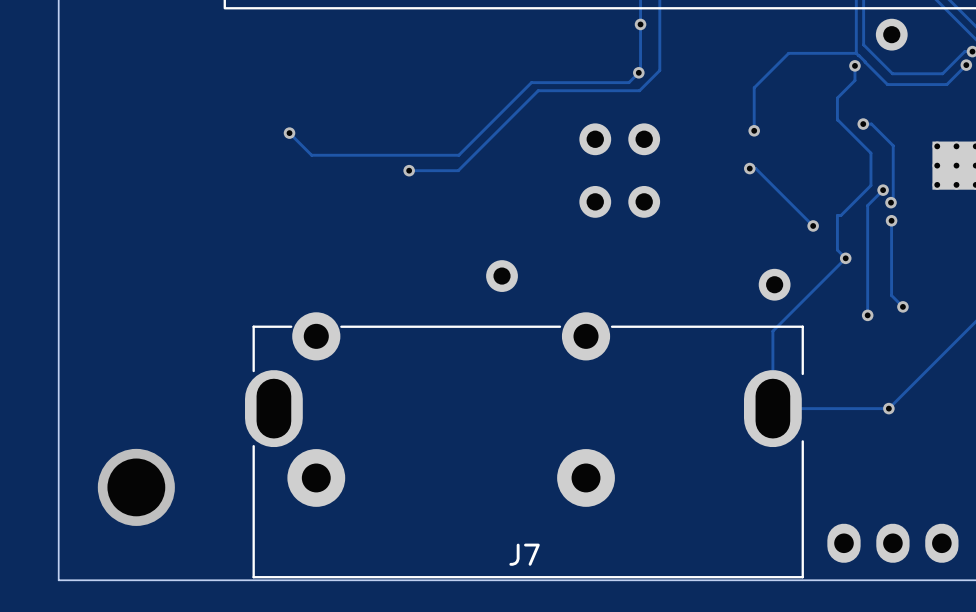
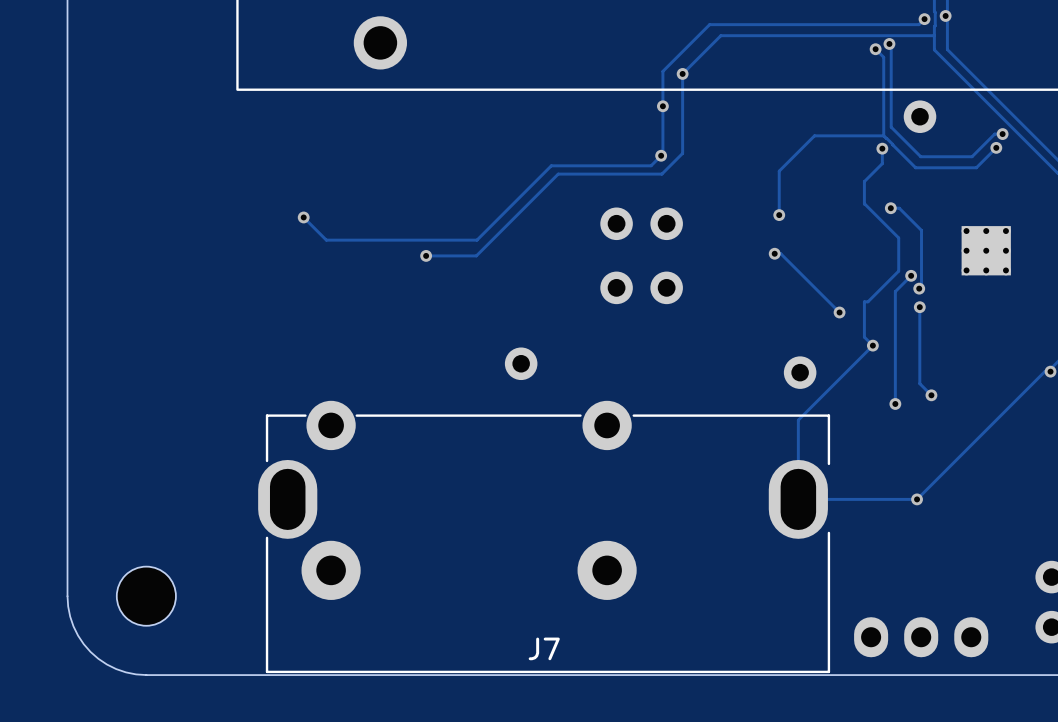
via: (136, 487) -> none
board edge: (58, 503) (58, 580) (135, 580) -> (67, 596) (73, 626) (90, 651) (116, 669) (146, 675)
part: none -> (146, 596)

